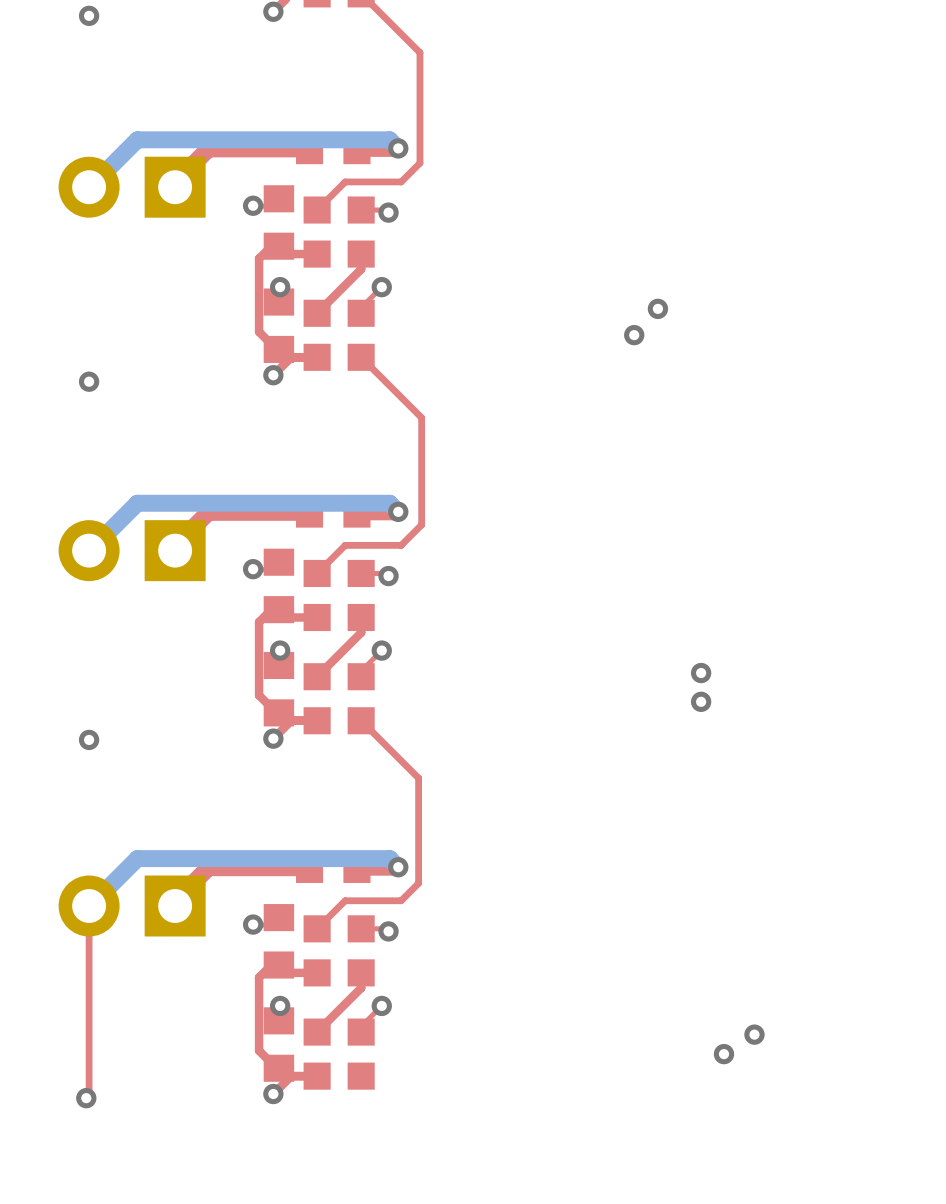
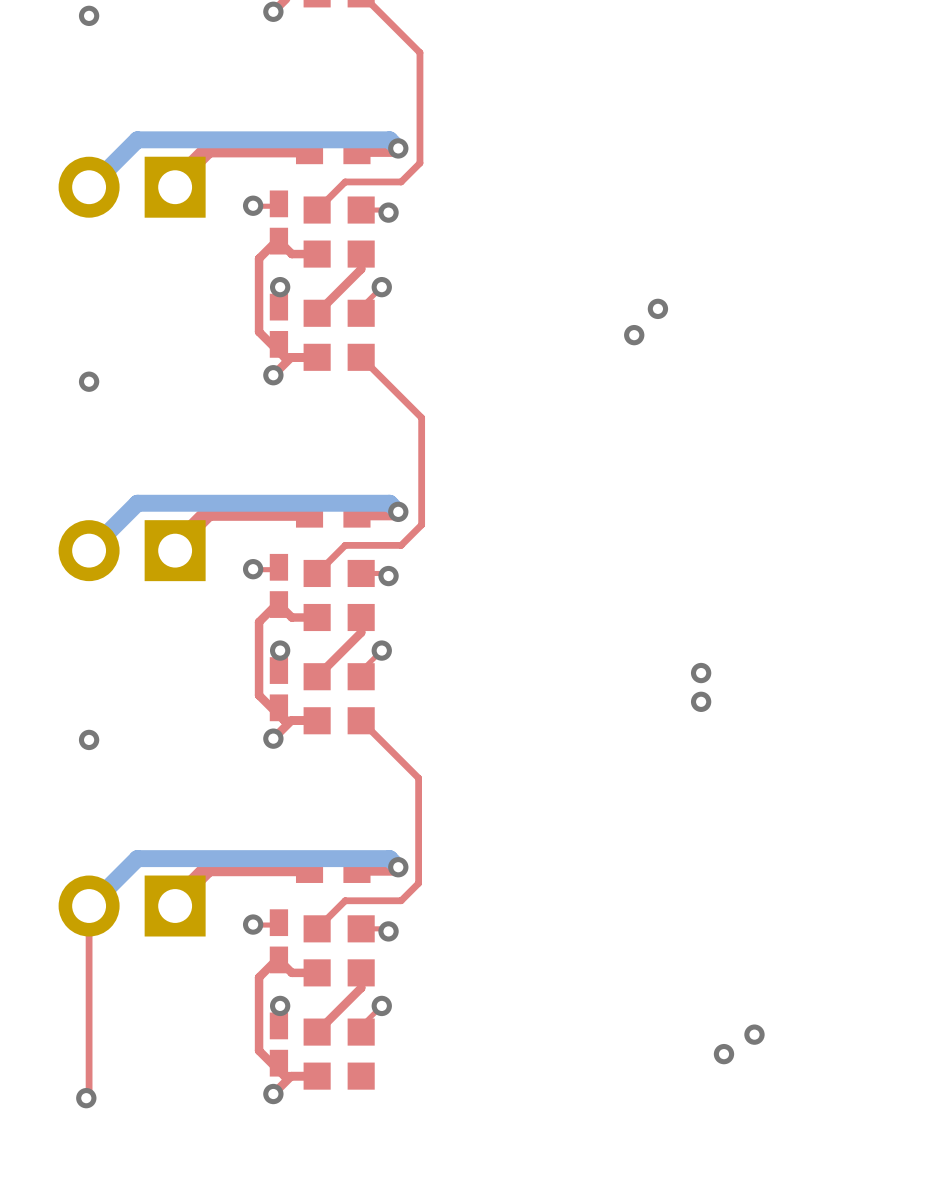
part footprint: [263, 185, 295, 260] -> [269, 190, 289, 255]
part footprint: [263, 288, 295, 364] -> [269, 293, 289, 358]
part footprint: [263, 548, 295, 624] -> [269, 553, 289, 618]
part footprint: [263, 651, 295, 727] -> [269, 657, 289, 722]
part footprint: [263, 904, 295, 979] -> [269, 909, 289, 974]
part footprint: [263, 1007, 295, 1082] -> [269, 1012, 289, 1077]

